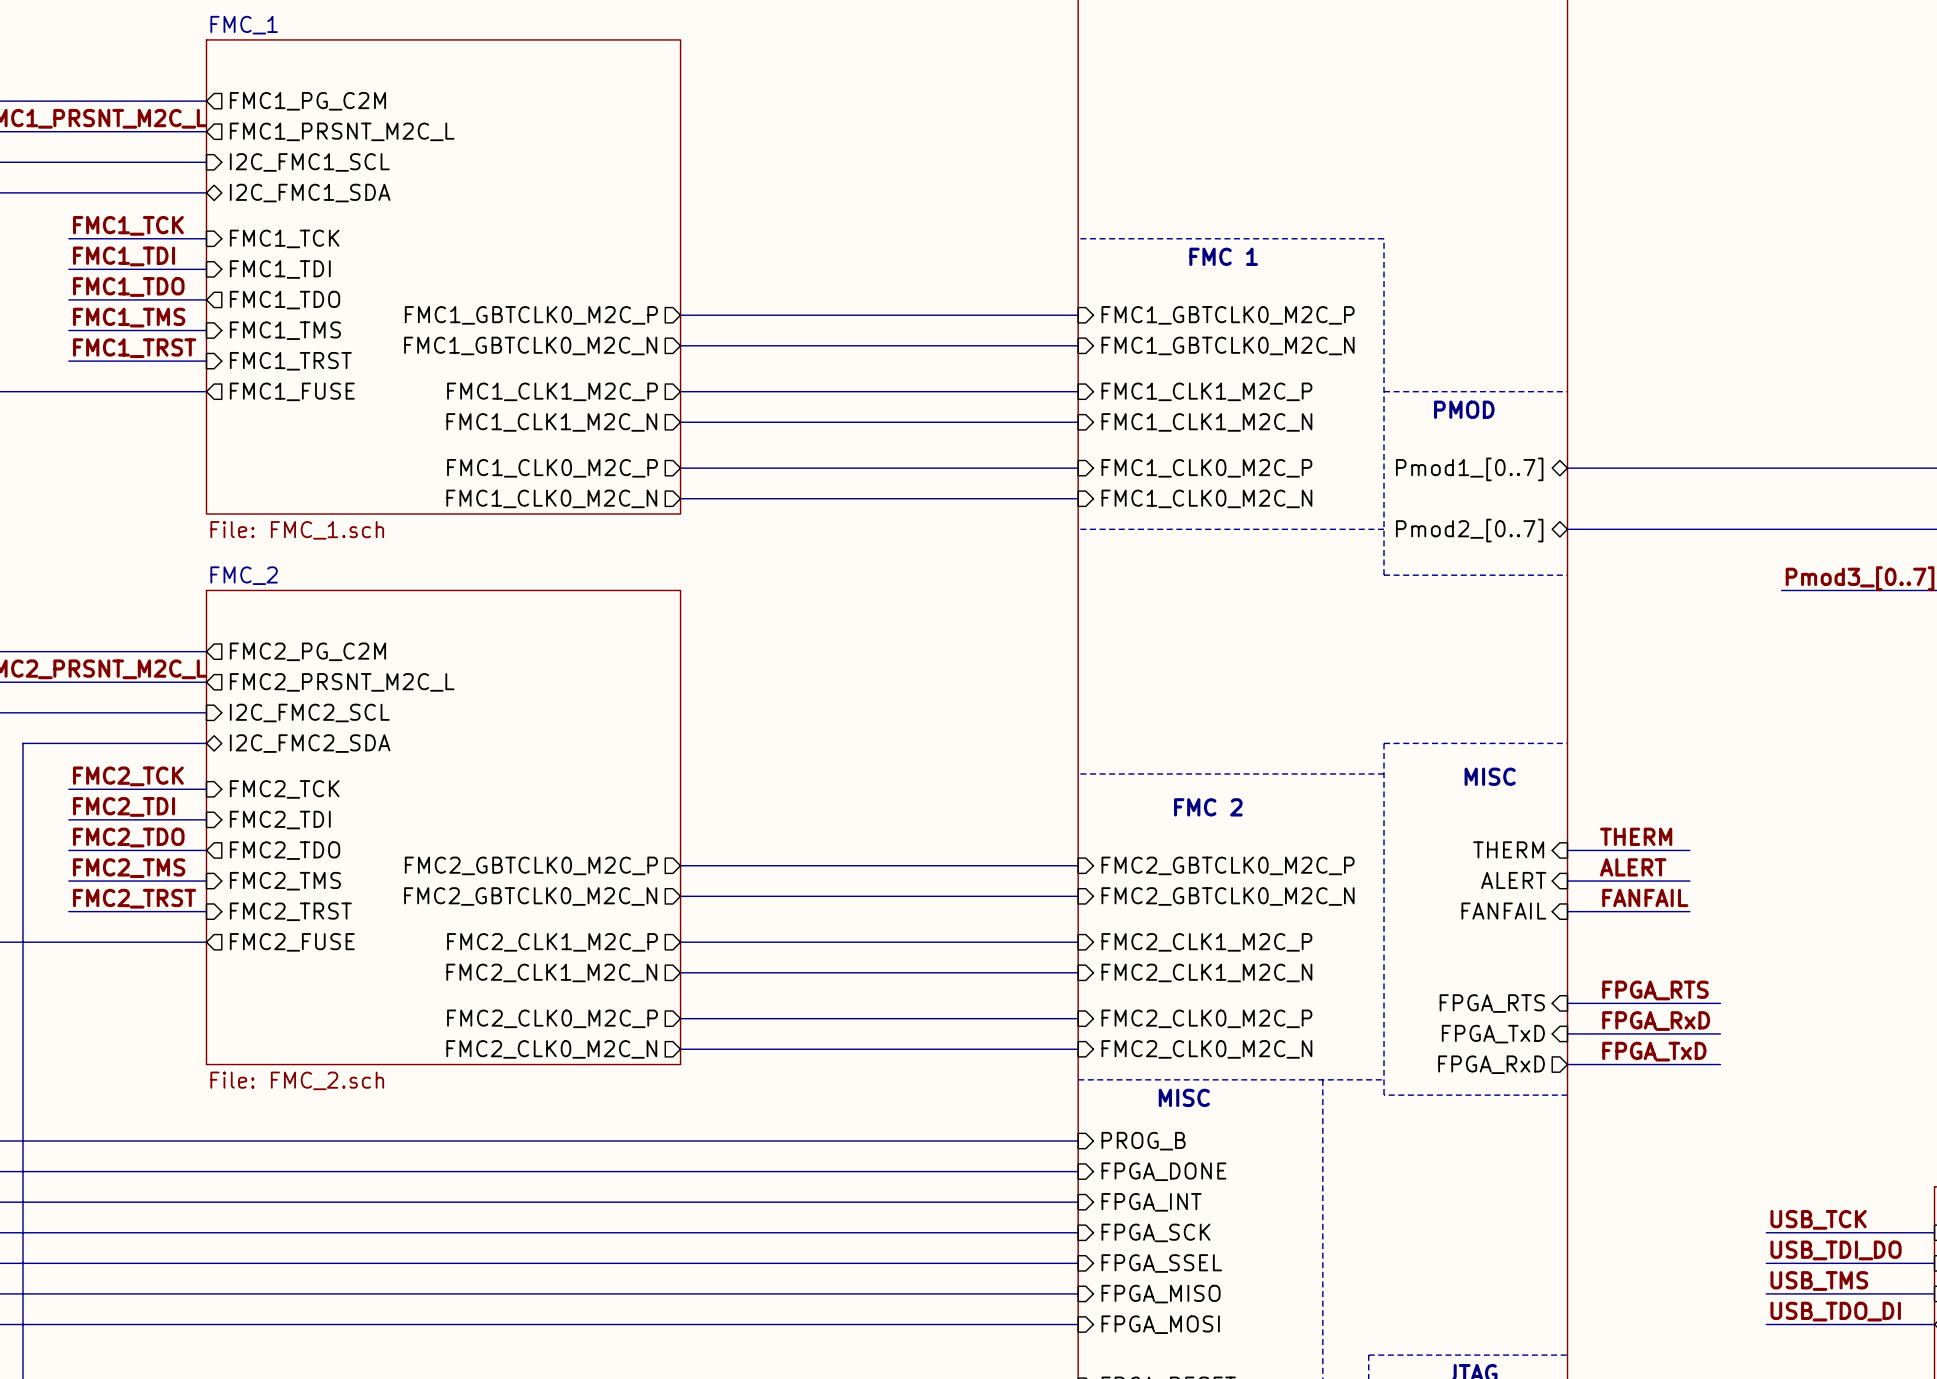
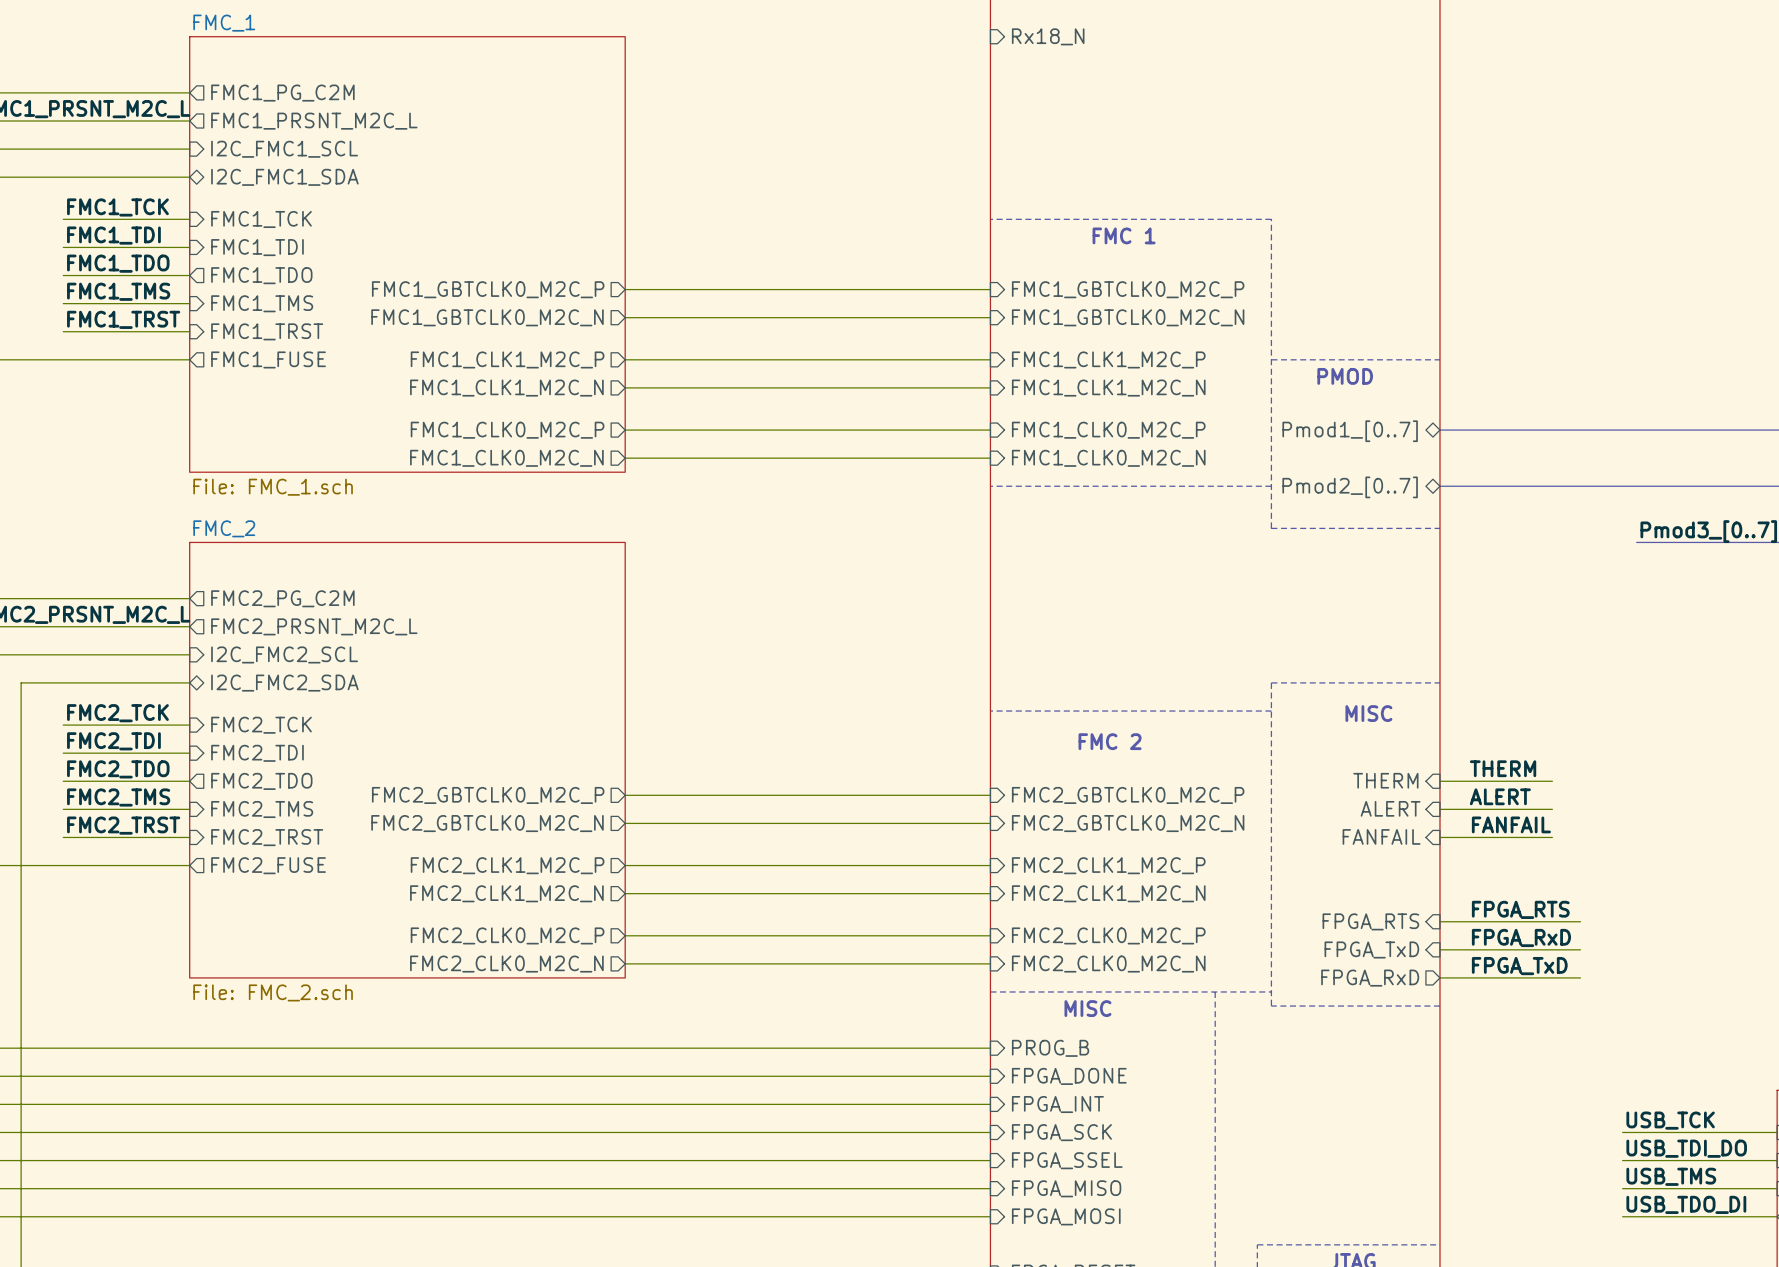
sheet pin: none -> Rx18_N (1048, 36)

